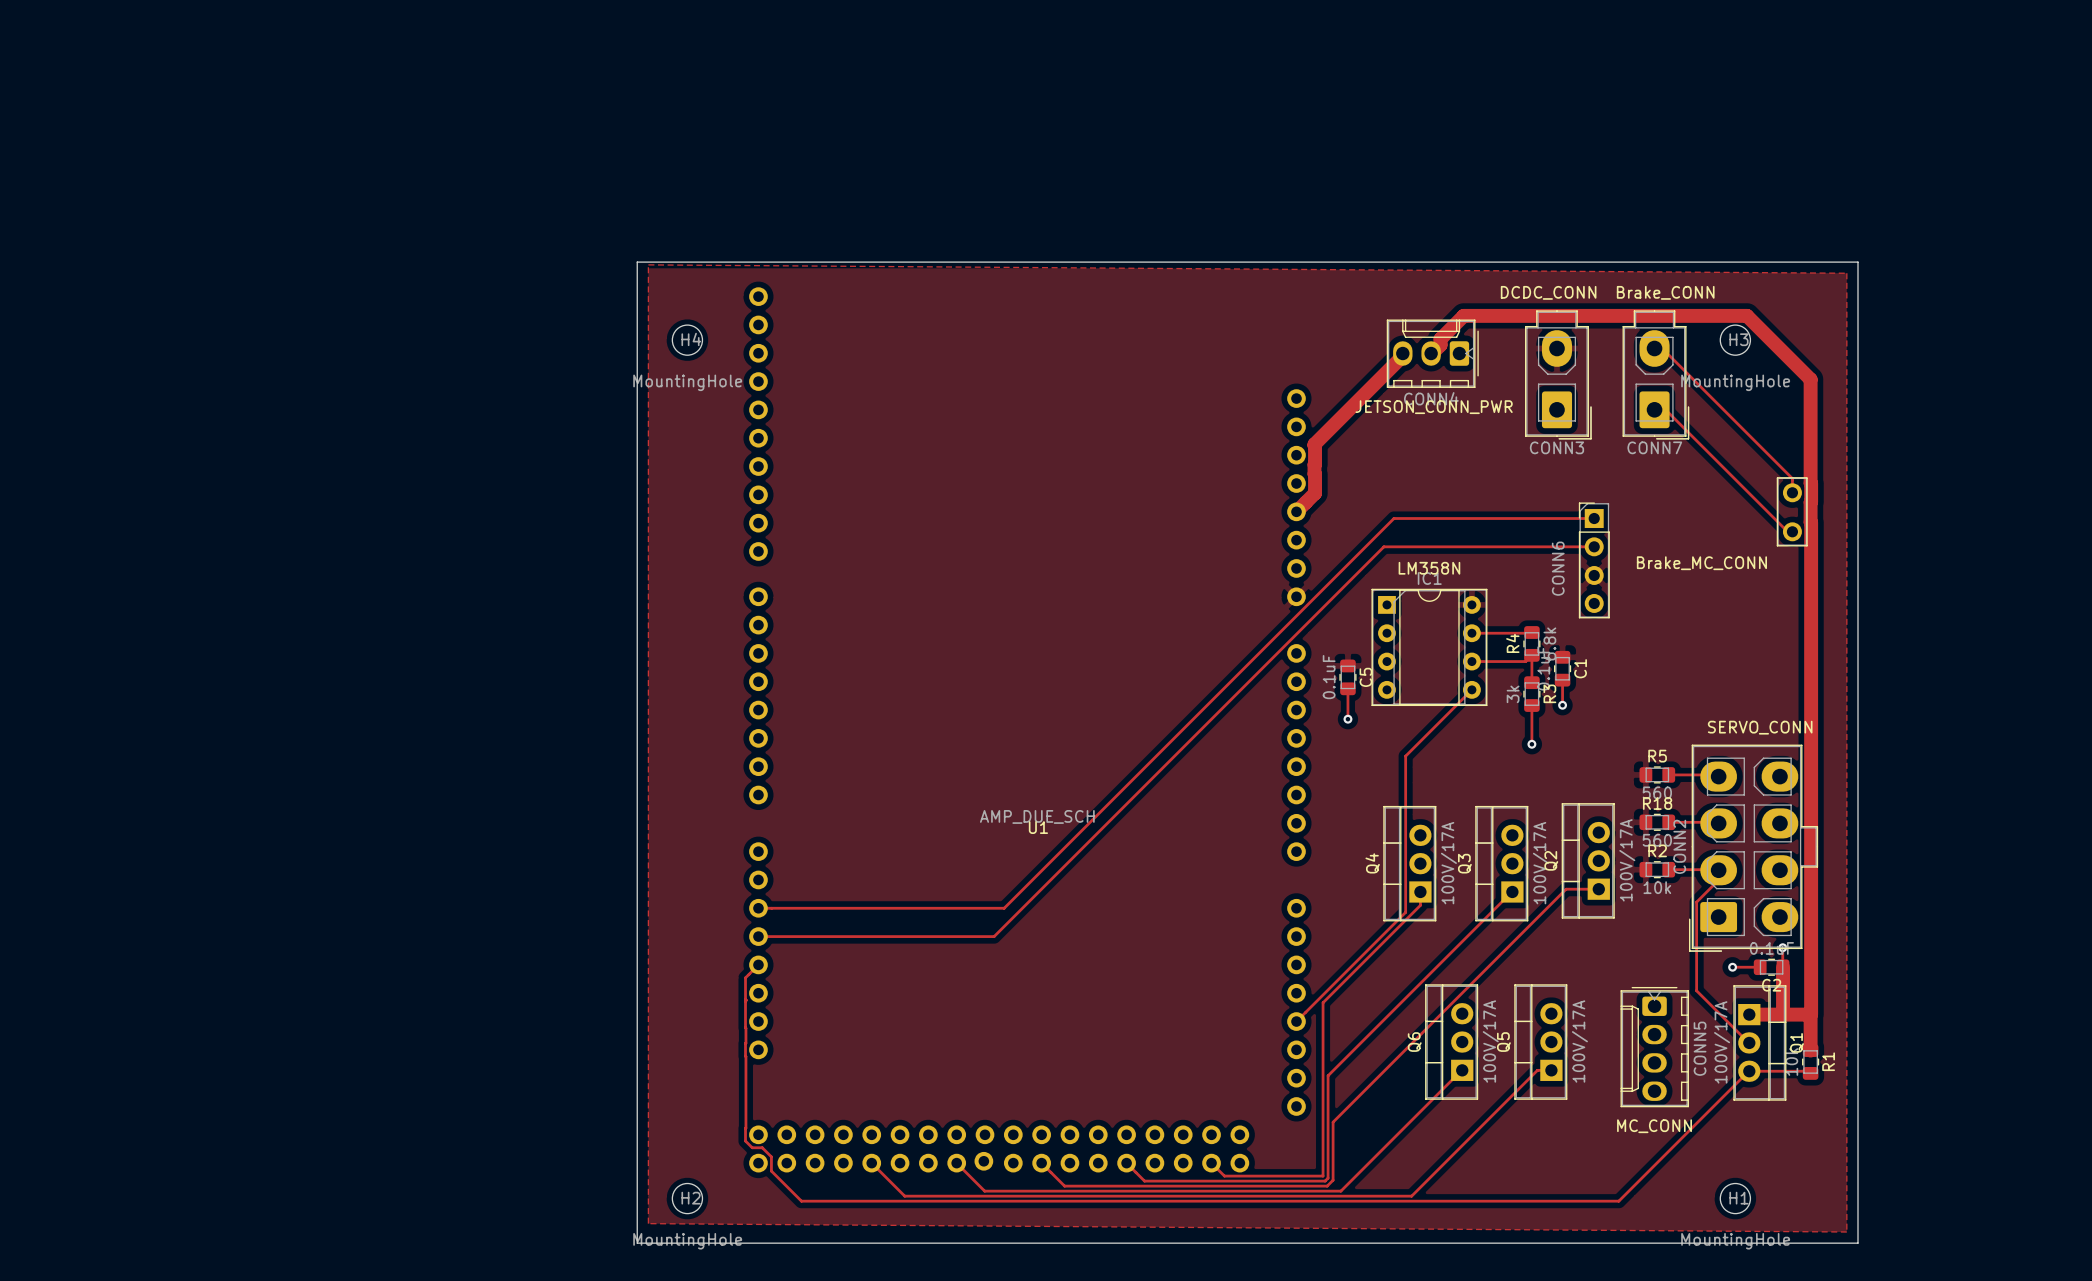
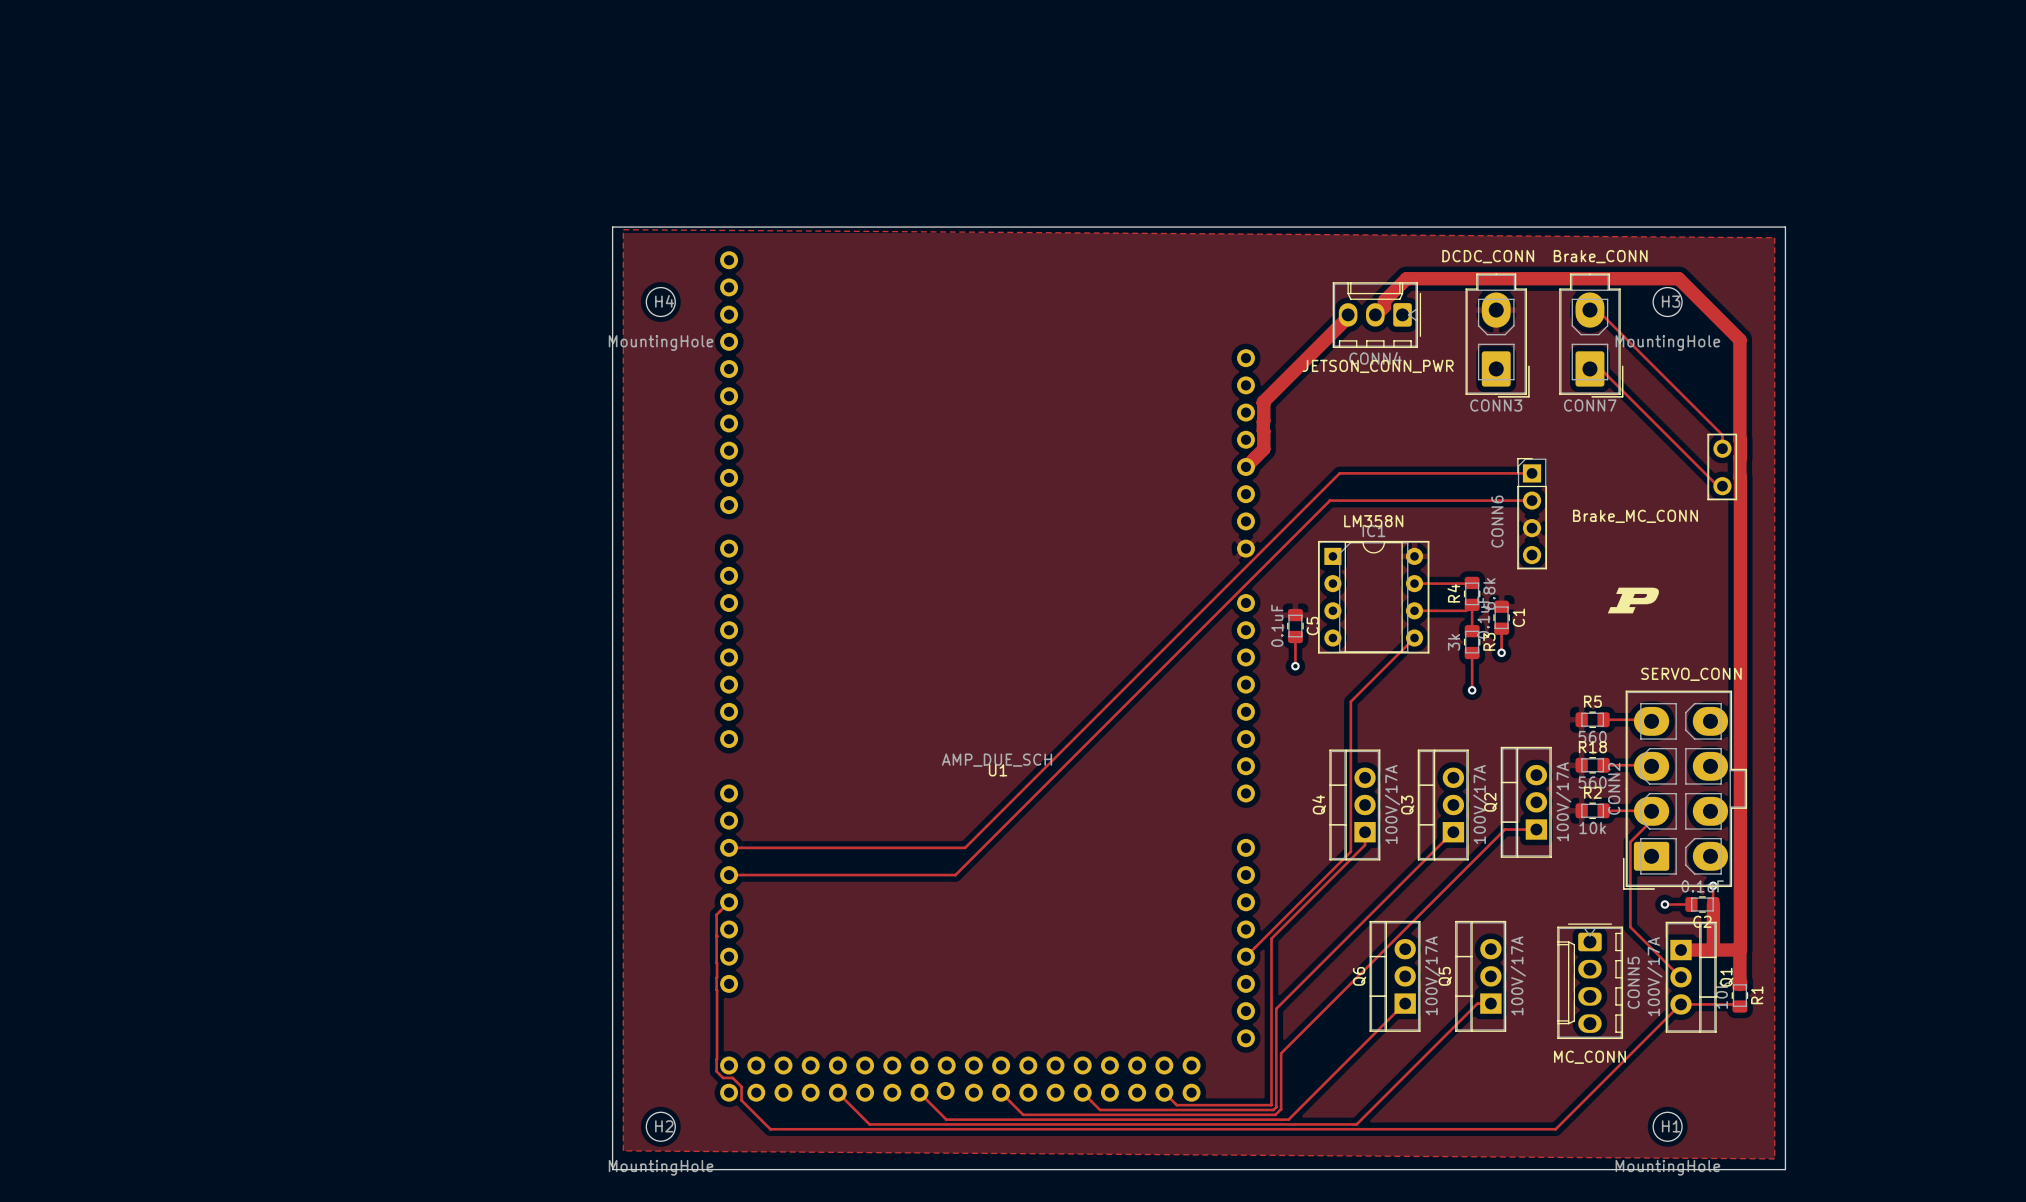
drawing: none -> [1607, 587, 1659, 614]

